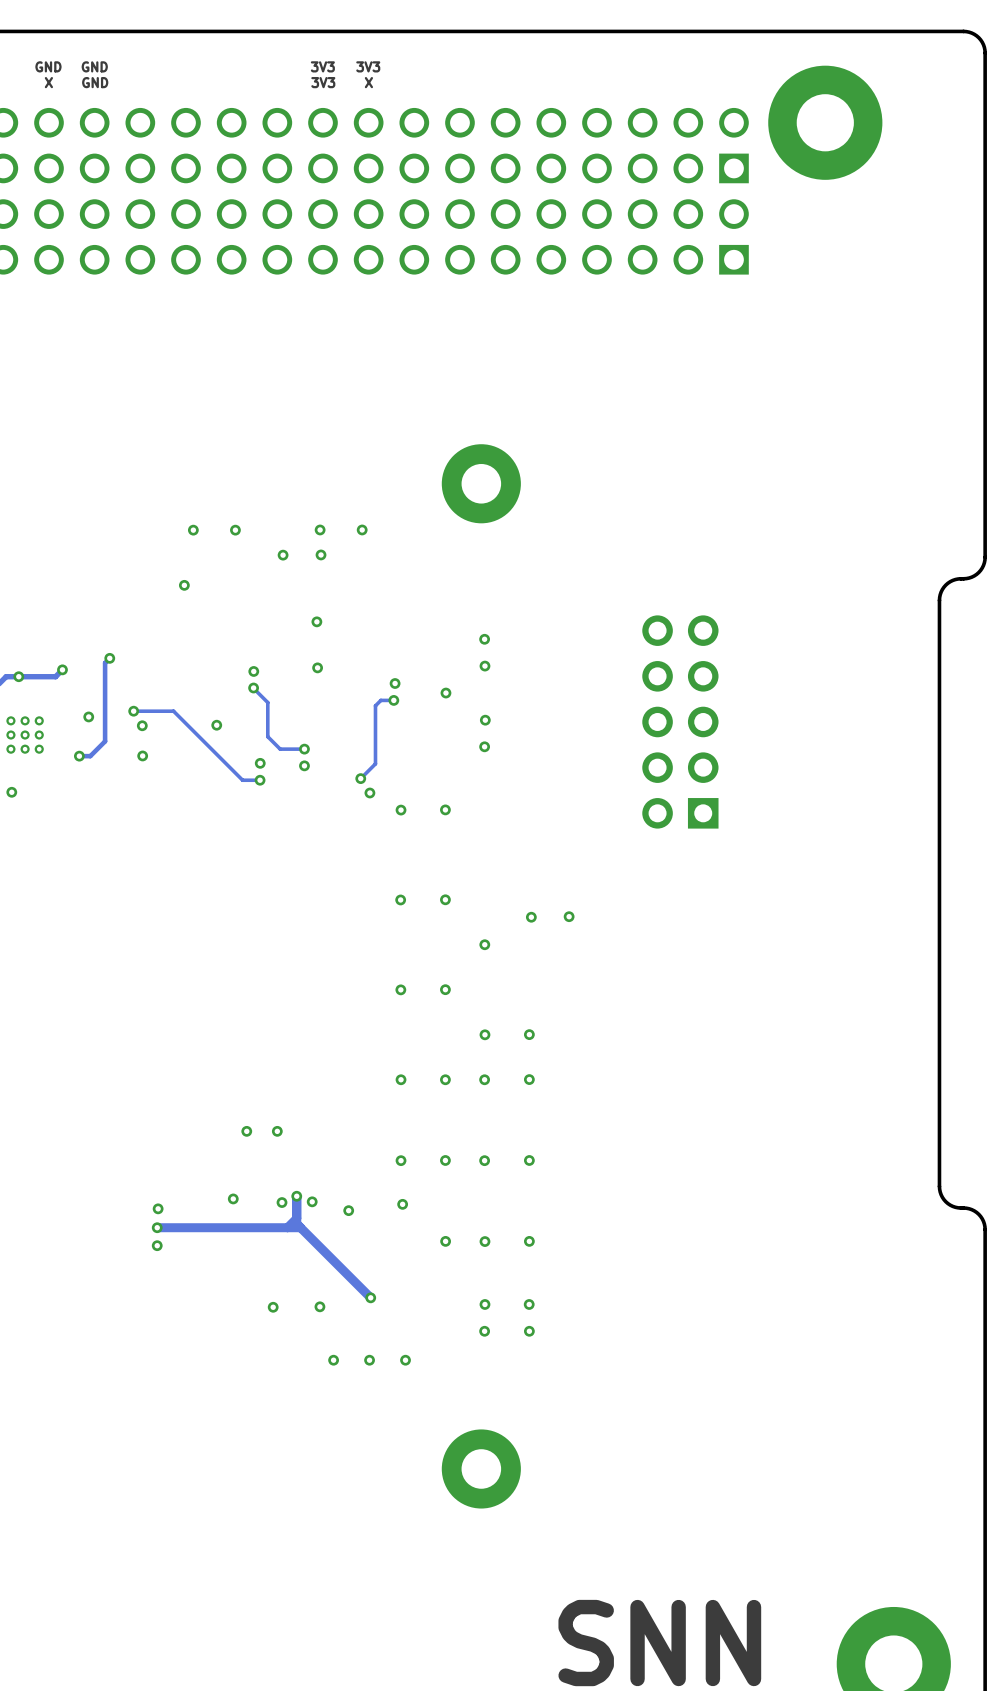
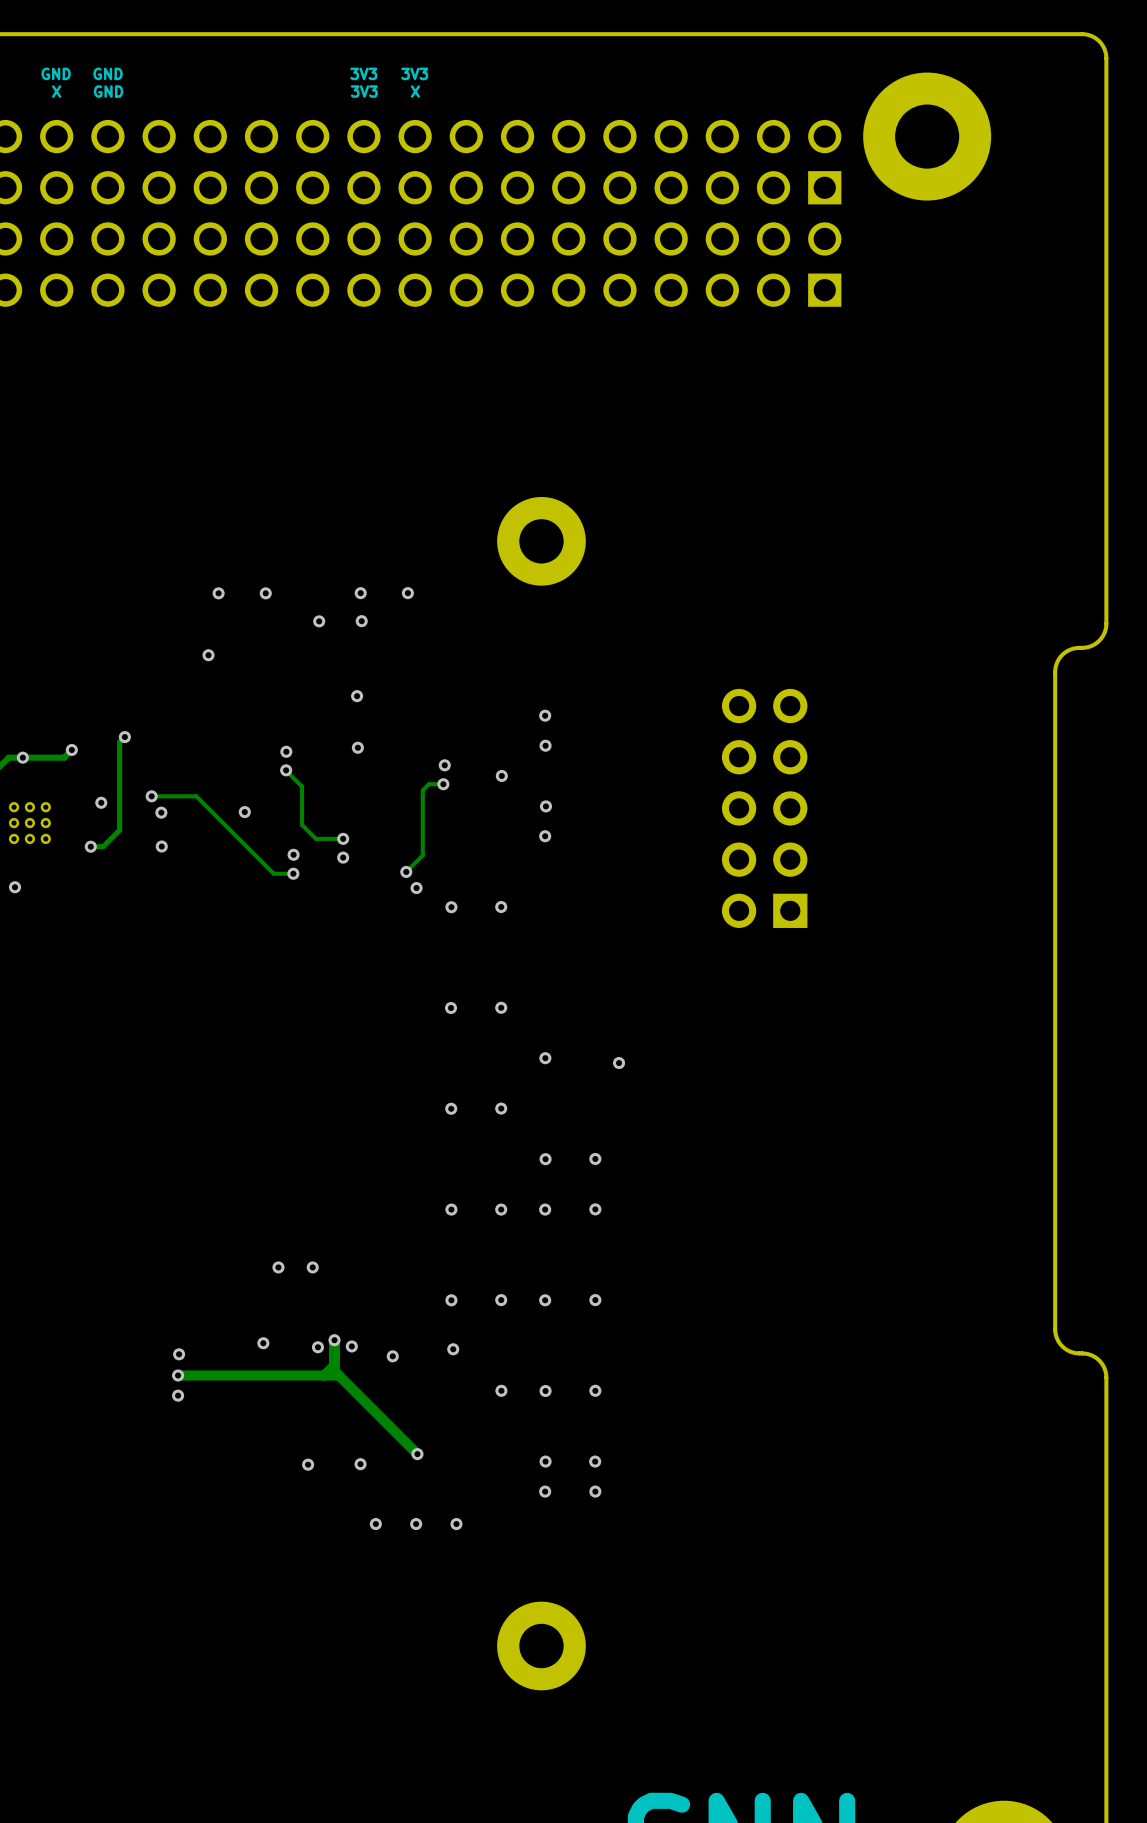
via: (569, 916) -> none
via: (531, 917) -> none
via: none -> (619, 1063)

